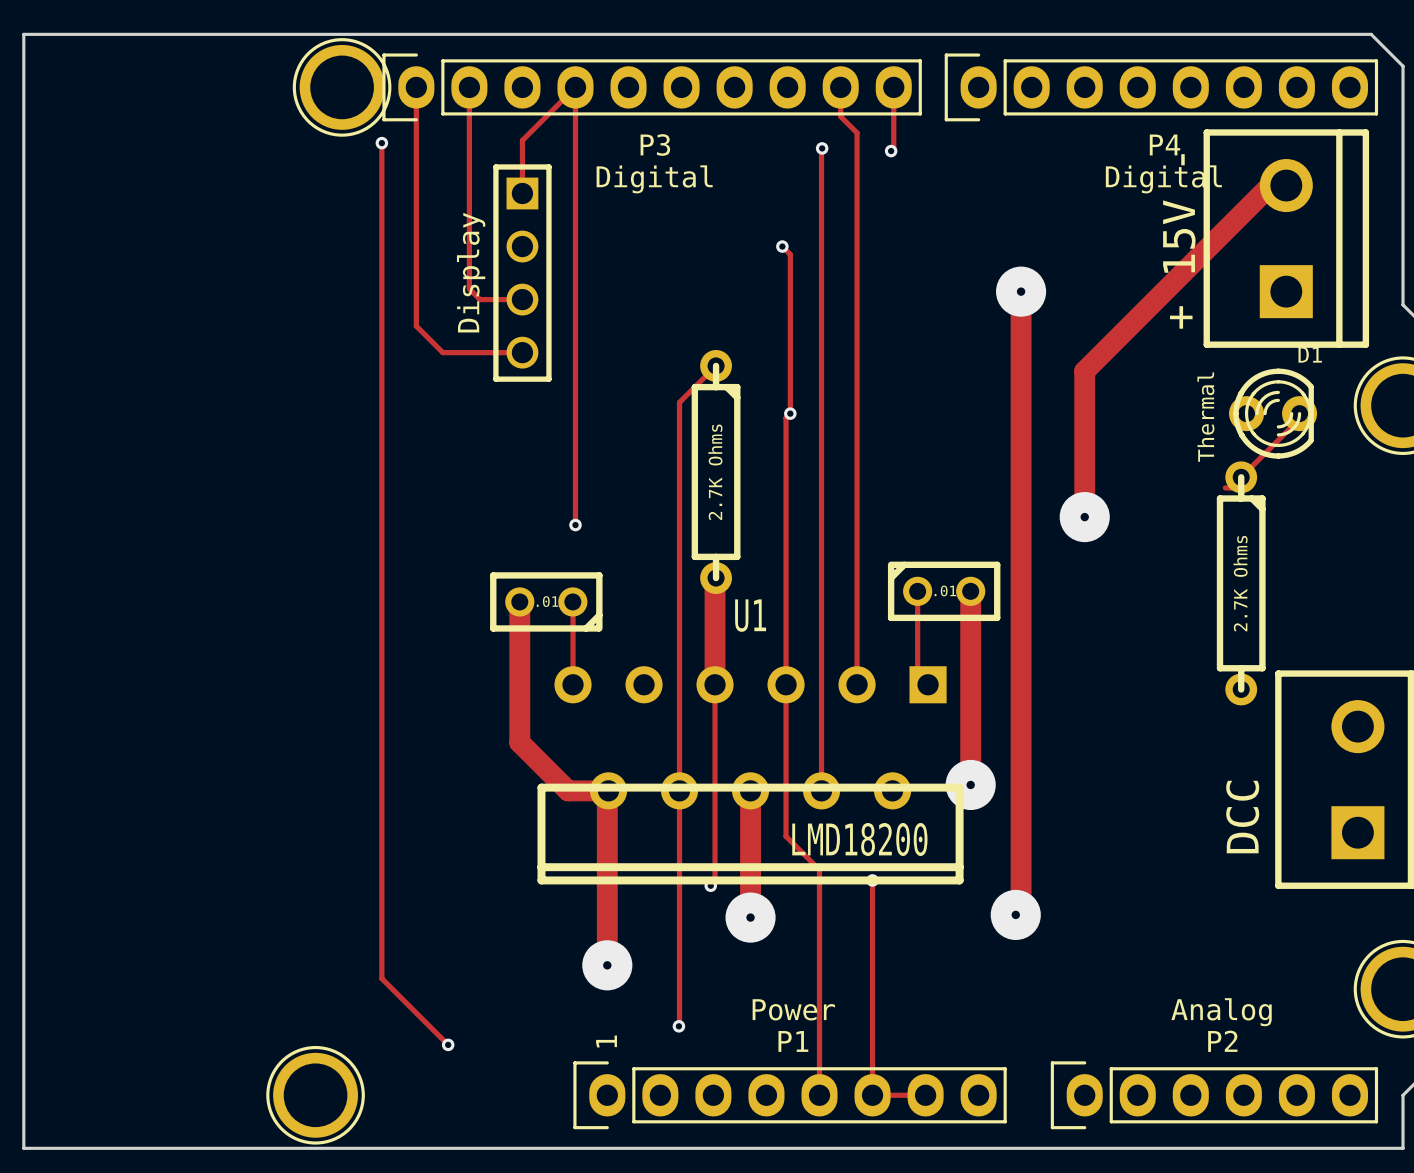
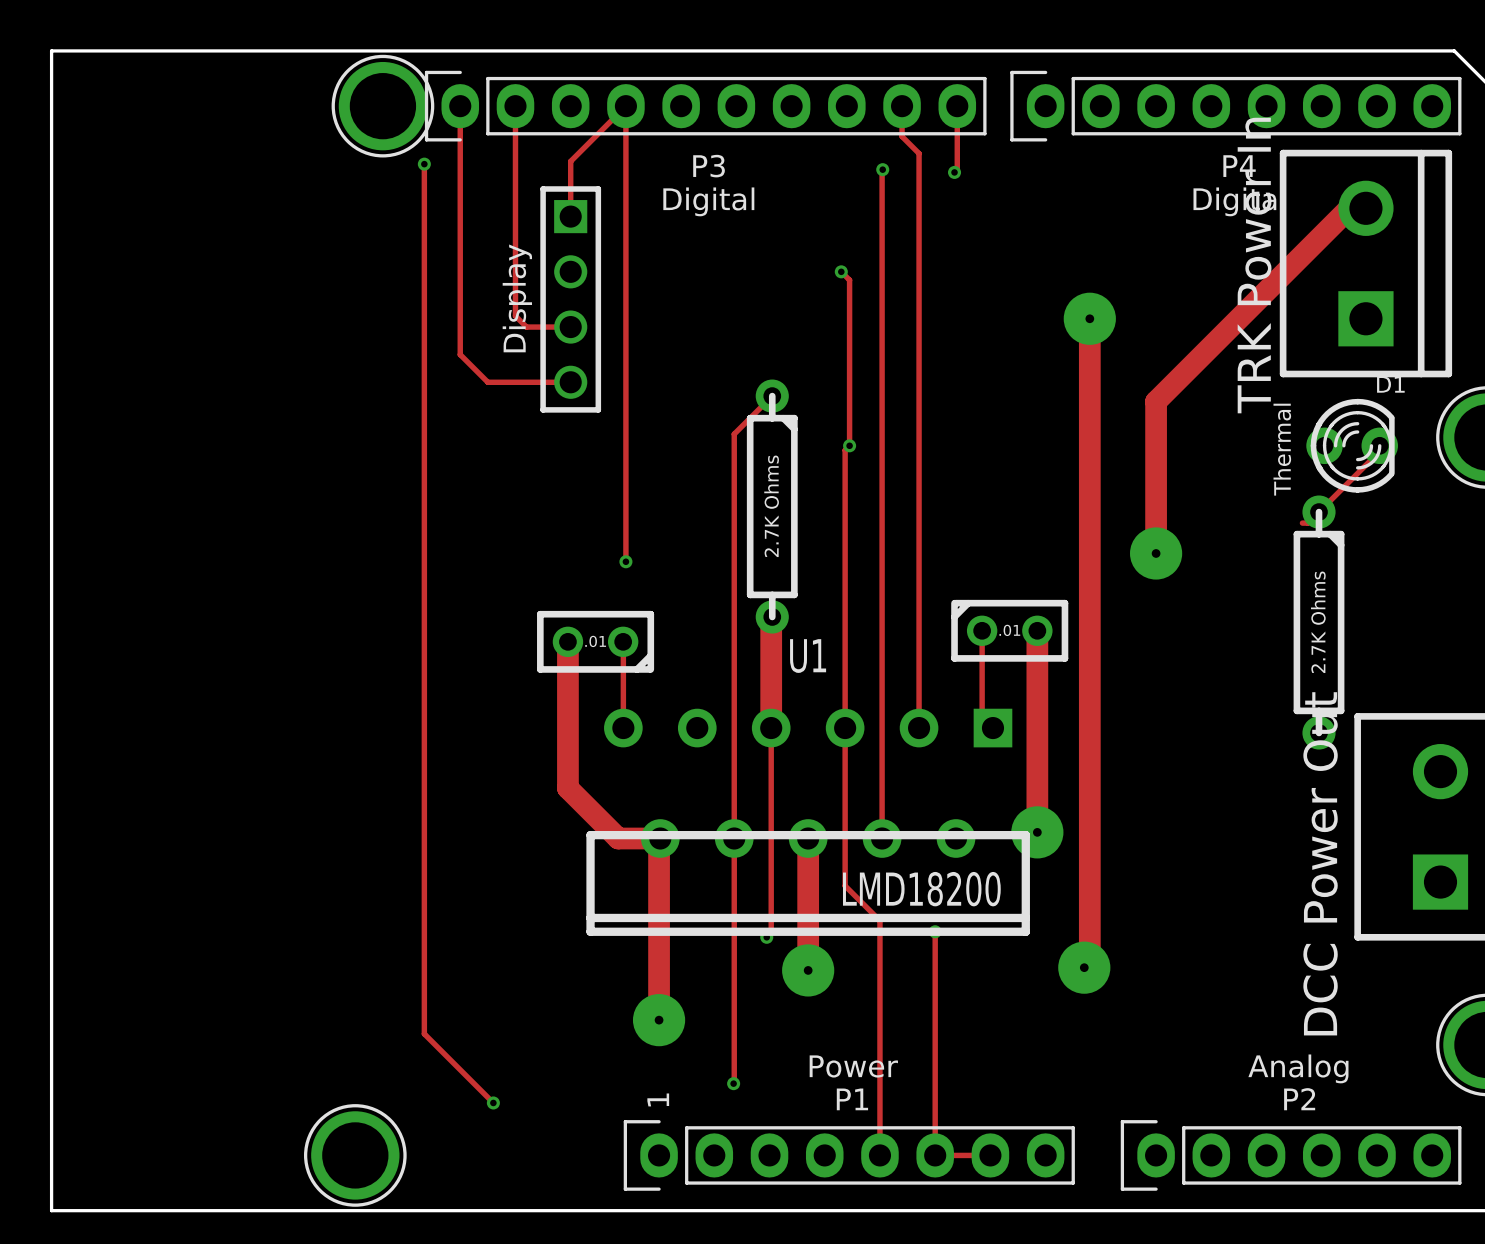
part value: + 15V - (1179, 241) -> TRK Power In (1254, 265)
part value: DCC (1242, 817) -> DCC Power Out (1320, 863)

